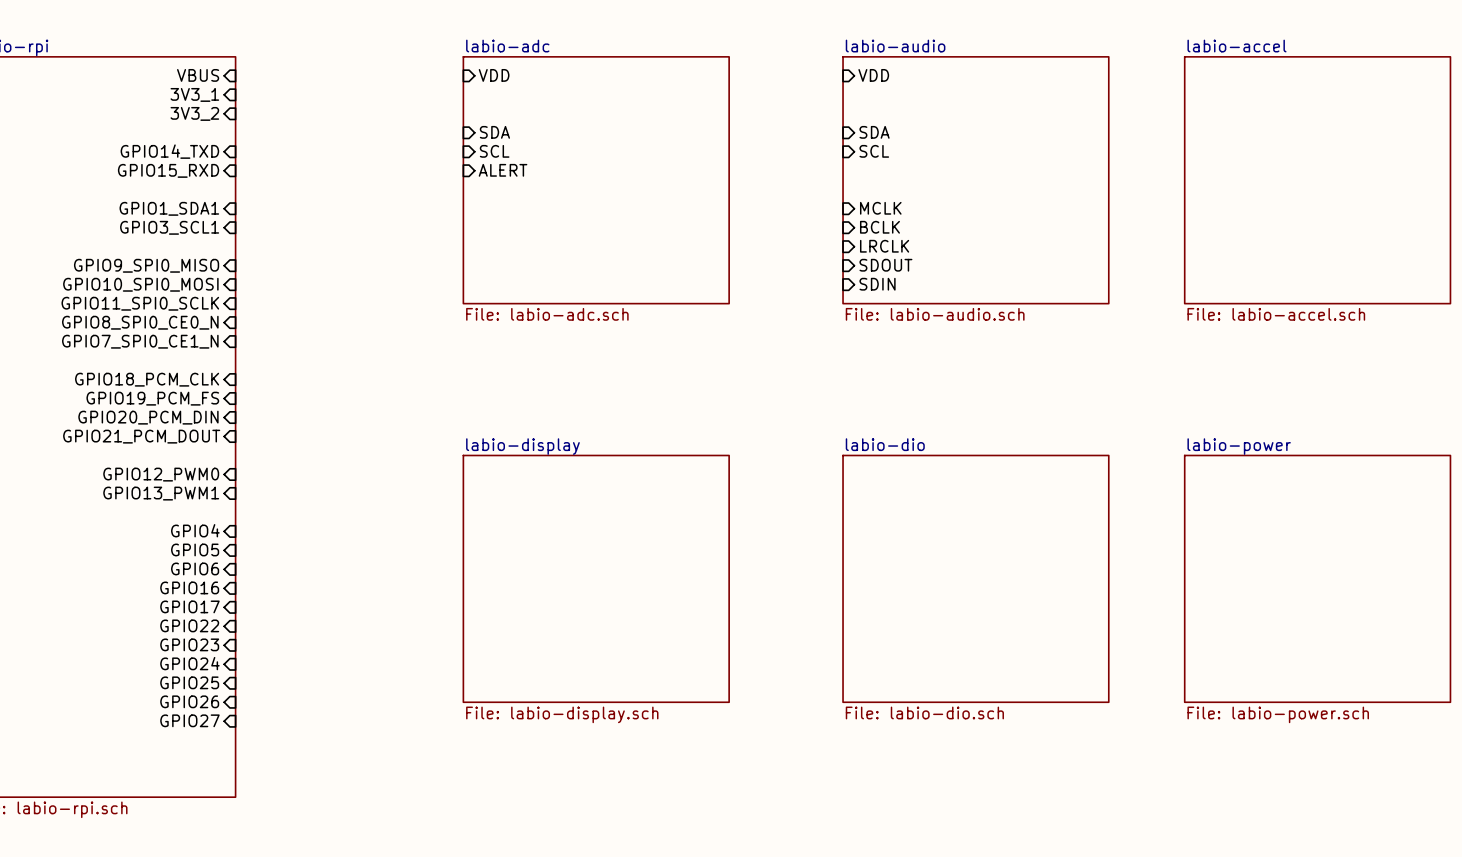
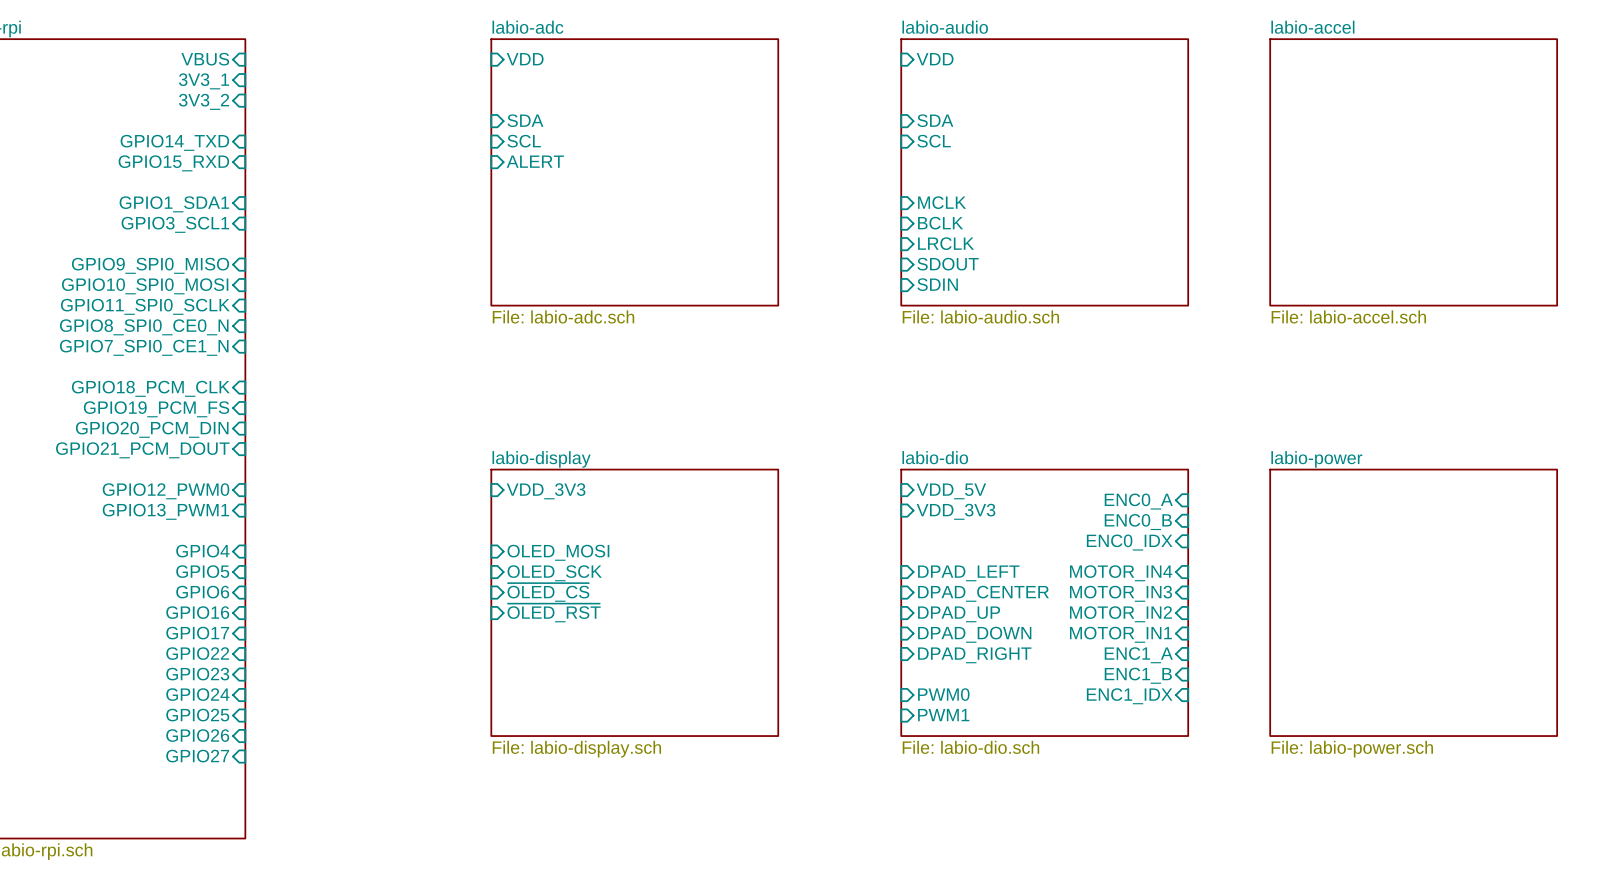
sheet pin: none -> VDD_3V3 (546, 491)
sheet pin: none -> VDD_5V (951, 491)
sheet pin: none -> ENC0_A (1138, 501)
sheet pin: none -> VDD_3V3 (956, 511)
sheet pin: none -> ENC0_B (1138, 522)
sheet pin: none -> ENC0_IDX (1129, 542)
sheet pin: none -> OLED_MOSI (558, 552)
sheet pin: none -> OLED_SCK (554, 573)
sheet pin: none -> DPAD_LEFT (968, 573)
sheet pin: none -> MOTOR_IN4 (1121, 573)
sheet pin: none -> ~{OLED_CS} (548, 592)
sheet pin: none -> DPAD_CENTER (983, 593)
sheet pin: none -> MOTOR_IN3 (1121, 593)
sheet pin: none -> ~{OLED_RST} (554, 612)
sheet pin: none -> DPAD_UP (959, 614)
sheet pin: none -> MOTOR_IN2 (1120, 614)
sheet pin: none -> DPAD_DOWN (974, 634)
sheet pin: none -> MOTOR_IN1 (1120, 634)
sheet pin: none -> DPAD_RIGHT (974, 655)
sheet pin: none -> ENC1_A (1138, 655)
sheet pin: none -> ENC1_B (1138, 675)
sheet pin: none -> PWM0 (943, 694)
sheet pin: none -> ENC1_IDX (1129, 696)
sheet pin: none -> PWM1 (943, 715)

